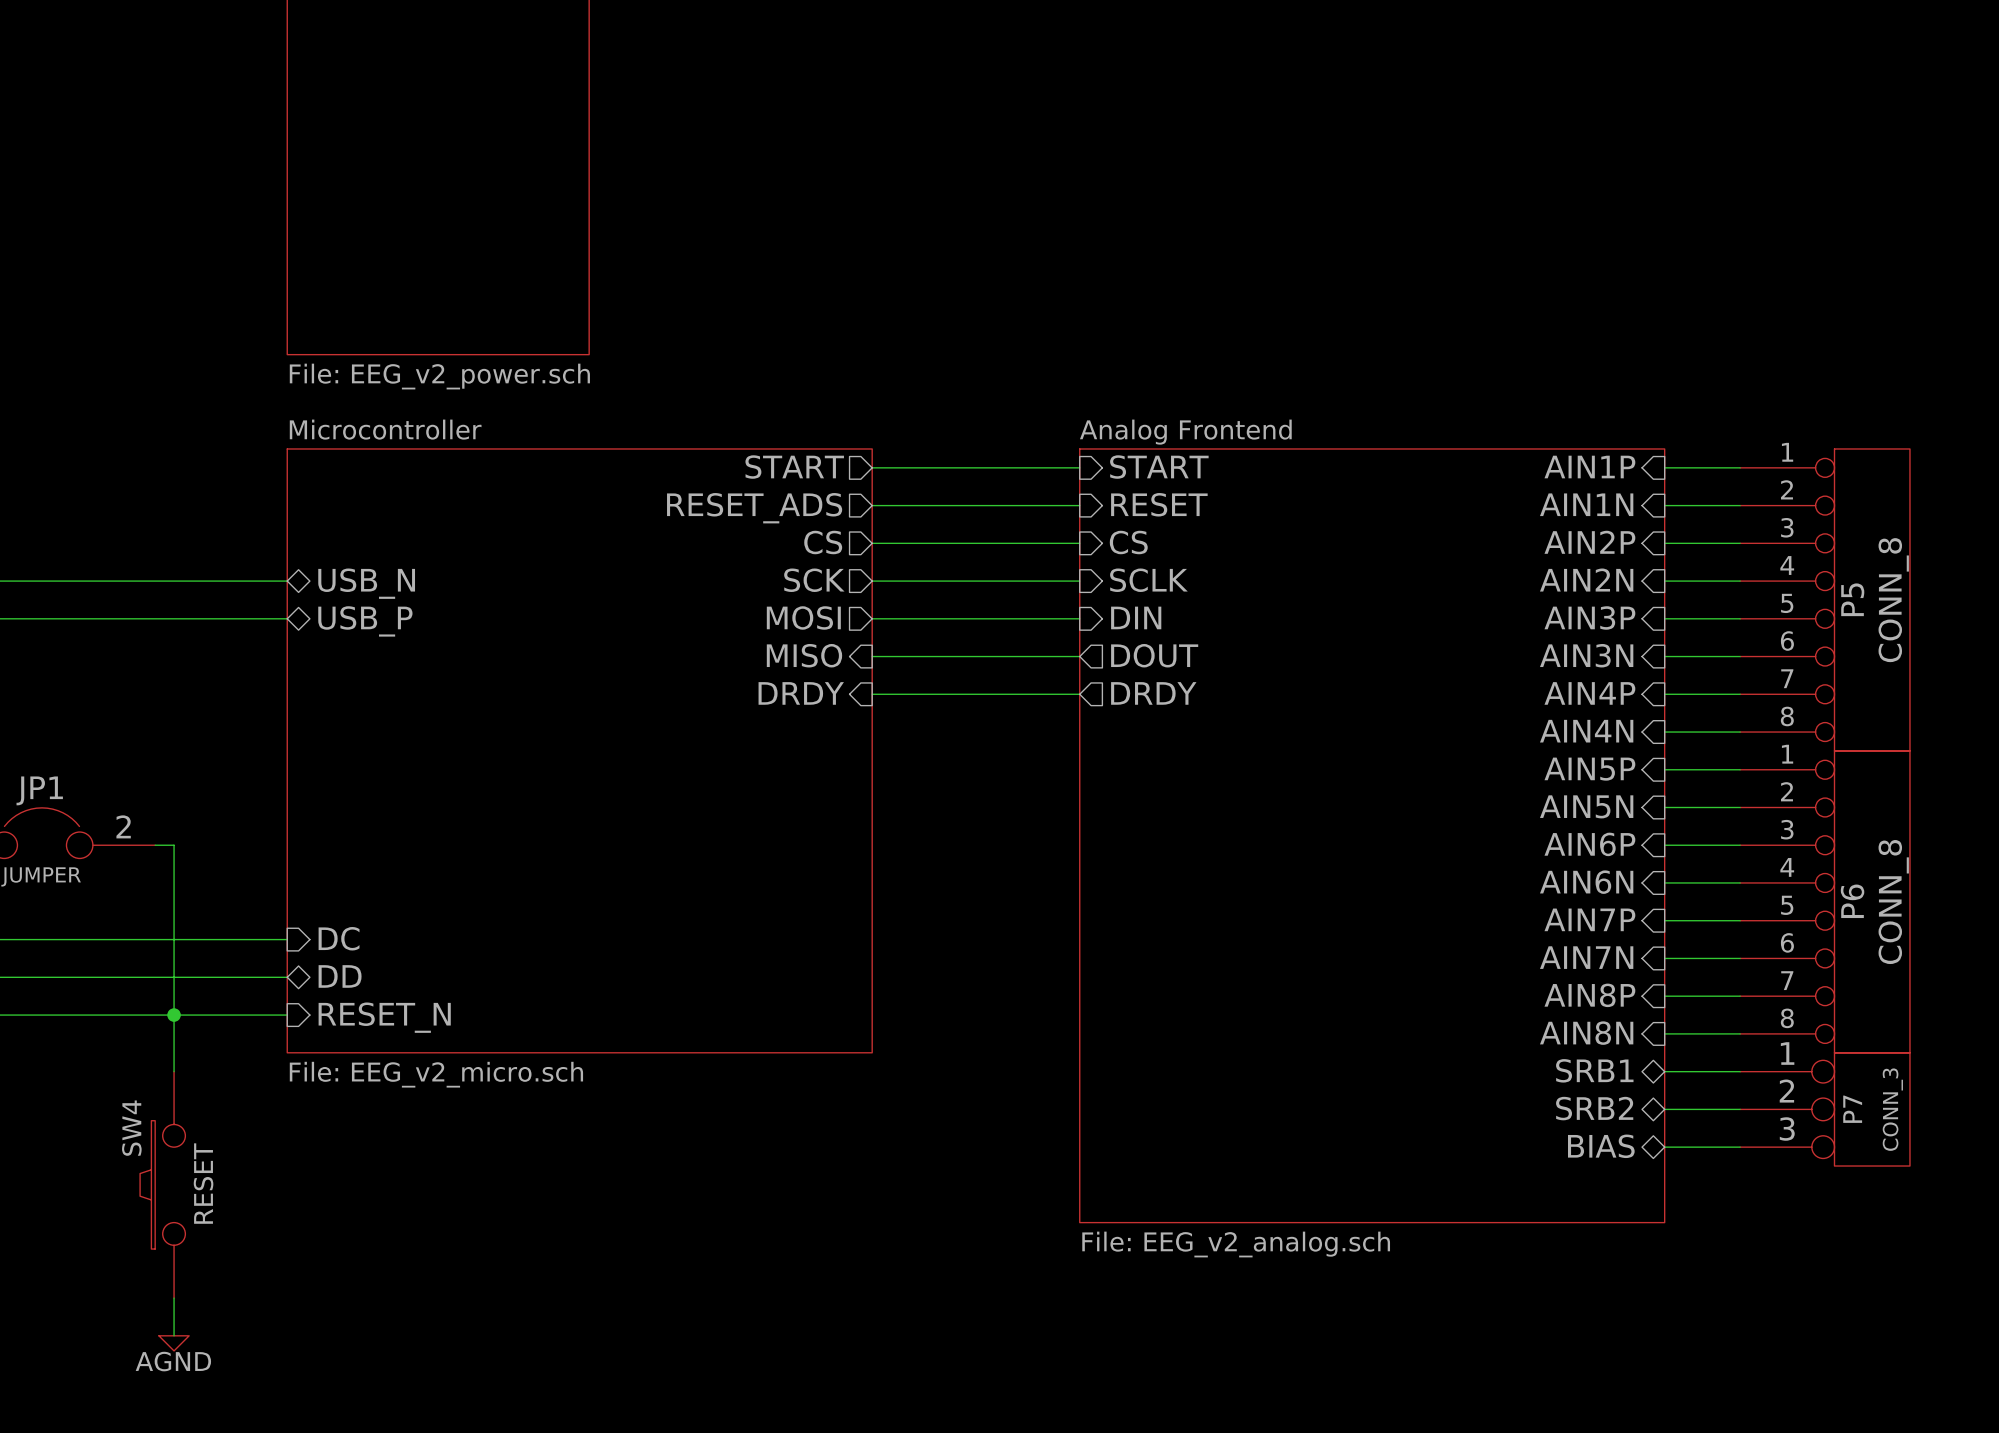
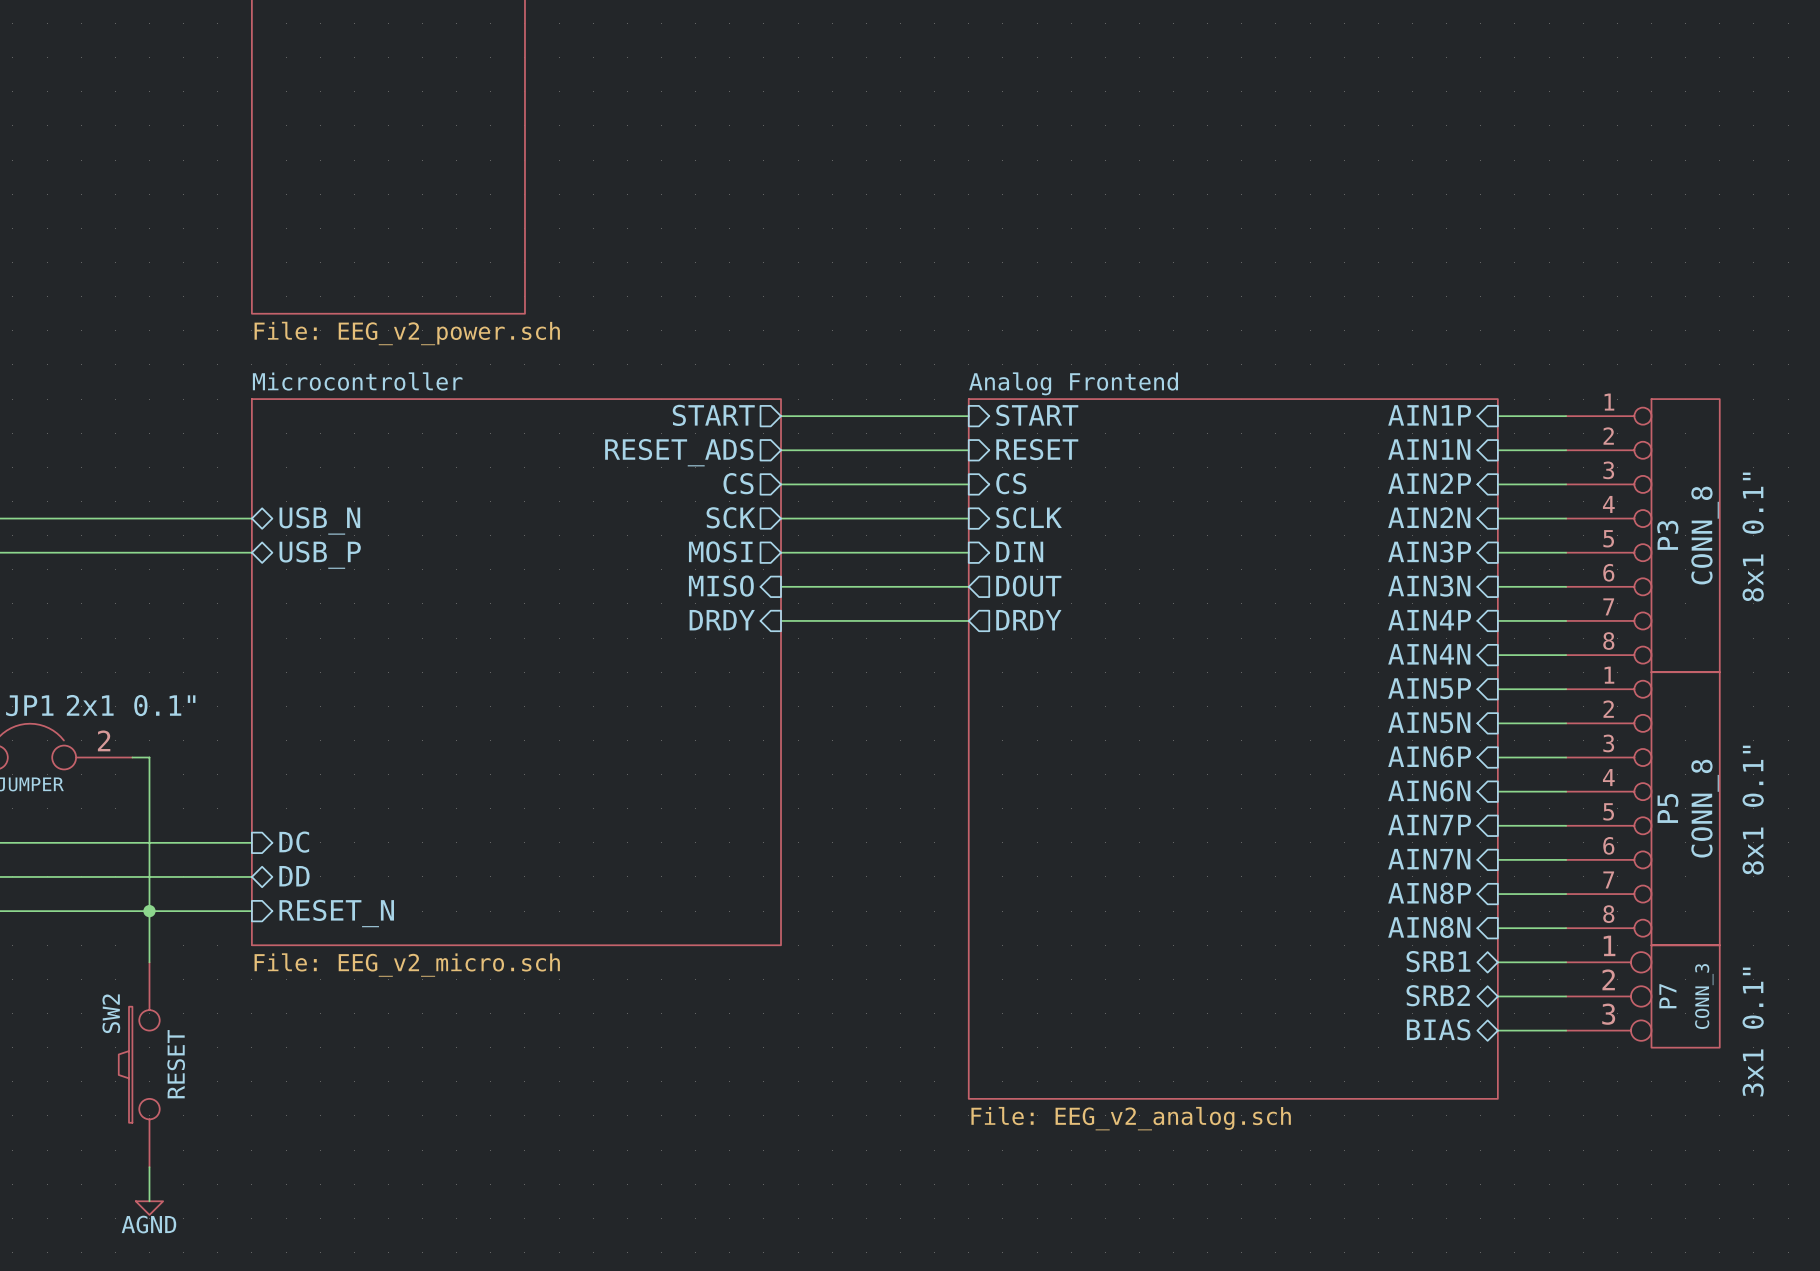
P5 name: P5 (1852, 599) -> P3 (1667, 535)
P5 text: none -> 8x1 0.1" (1753, 537)
JP1 text: none -> 2x1 0.1" (131, 705)
P6 name: P6 (1852, 901) -> P5 (1667, 808)
P6 text: none -> 8x1 0.1" (1753, 810)
SW4 name: SW4 (131, 1128) -> SW2 (111, 1013)
P7 text: none -> 3x1 0.1" (1753, 1031)

